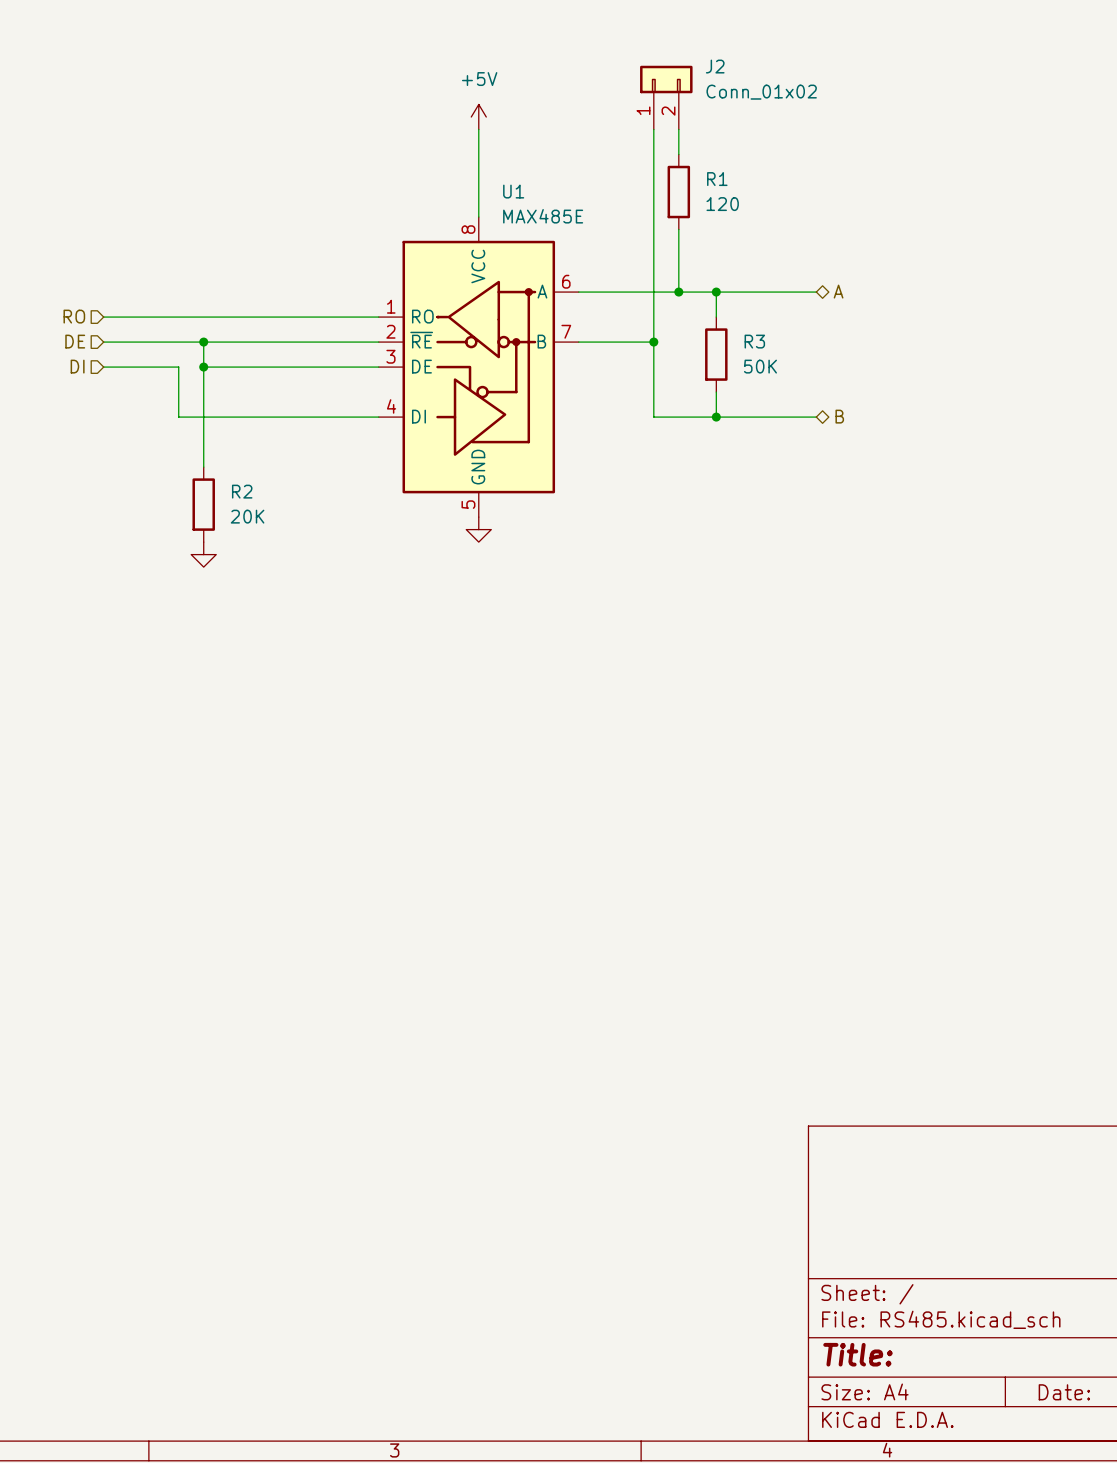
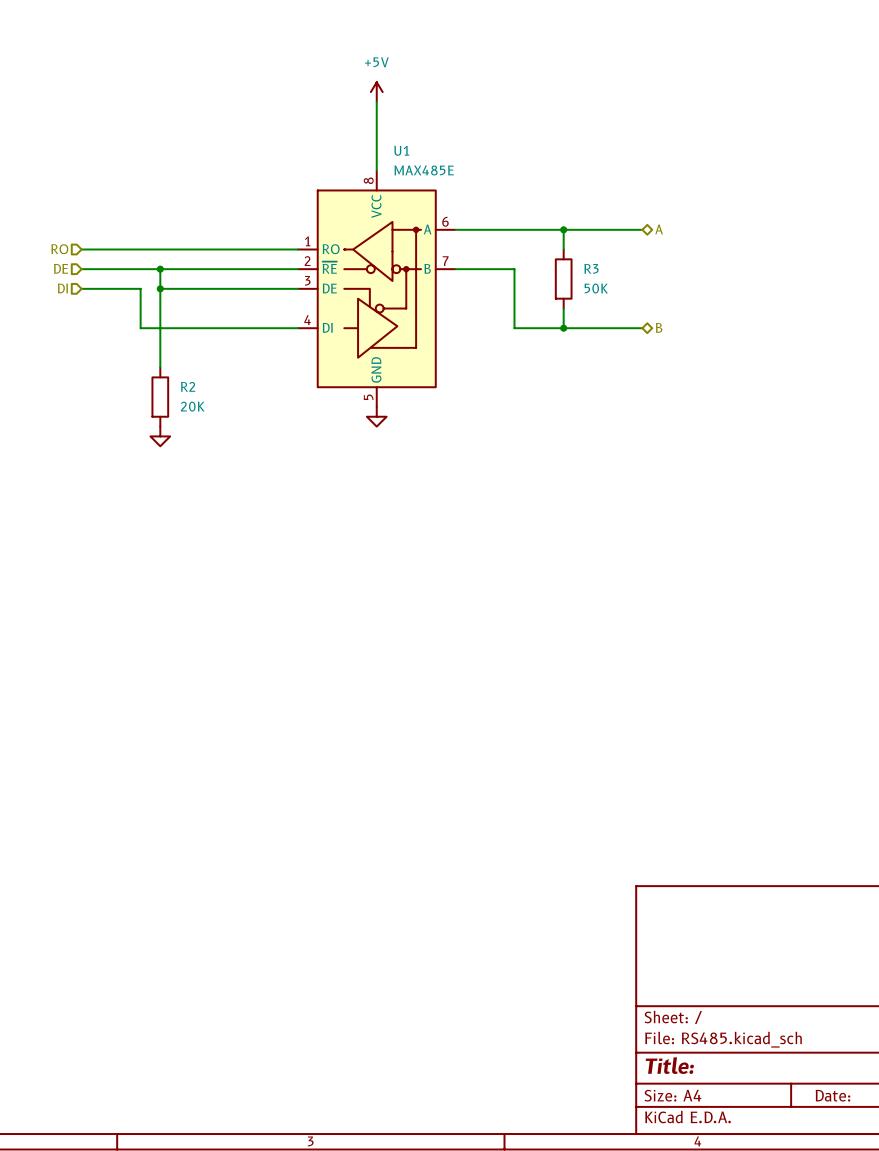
J2: Conn_01x02 (666, 97) -> none
wire: (653, 129) (653, 342) -> none
wire: (678, 129) (678, 154) -> none
R1: 120 (678, 192) -> none
wire: (678, 229) (678, 292) -> none
junction: (678, 292) -> none
junction: (653, 342) -> none

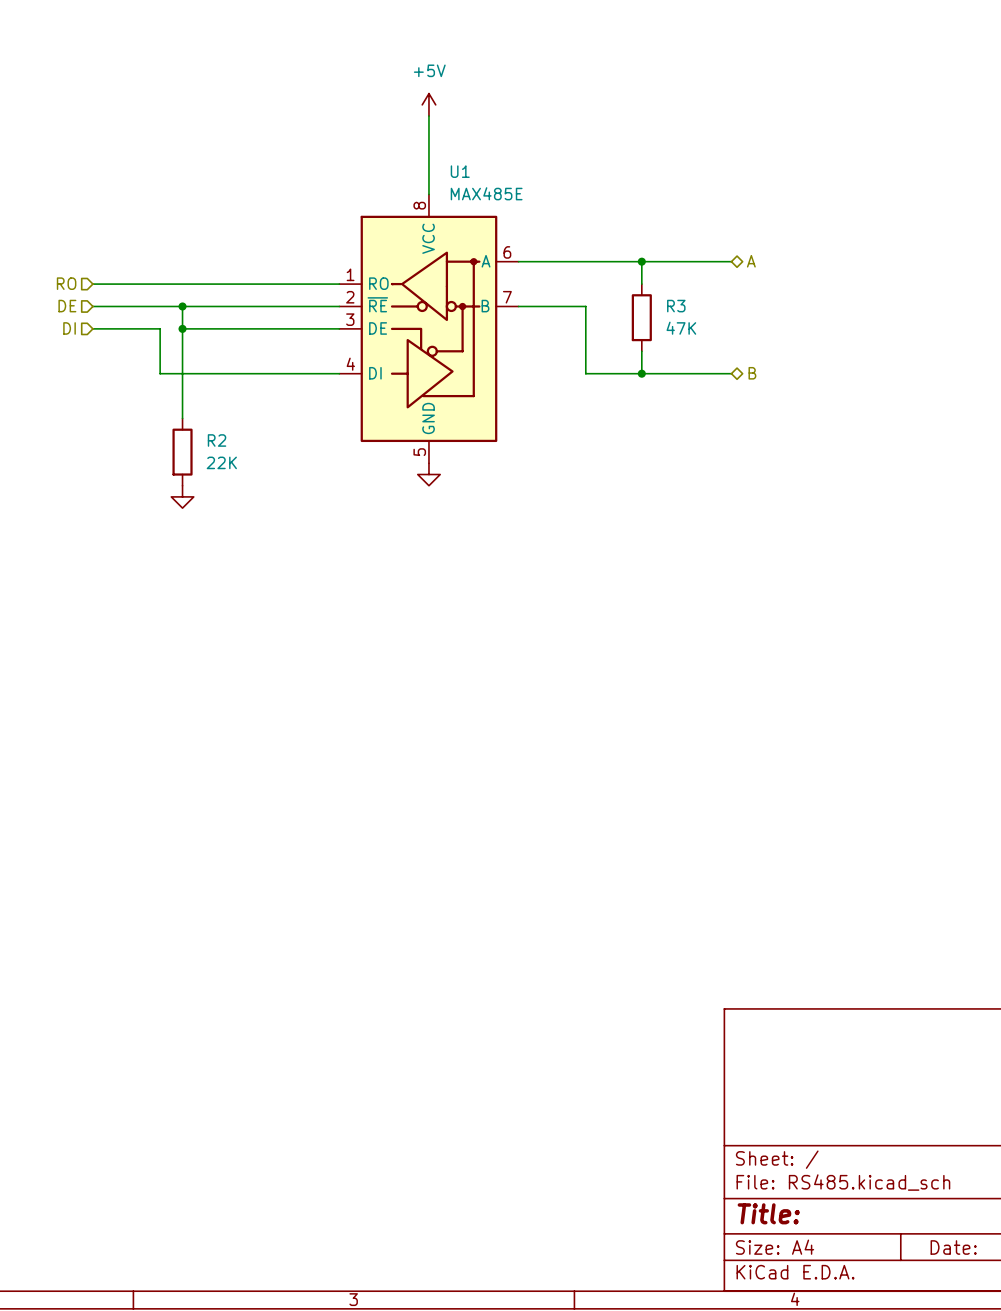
R3 value: 50K (596, 288) -> 47K (681, 328)
R2 value: 20K (192, 406) -> 22K (221, 462)

